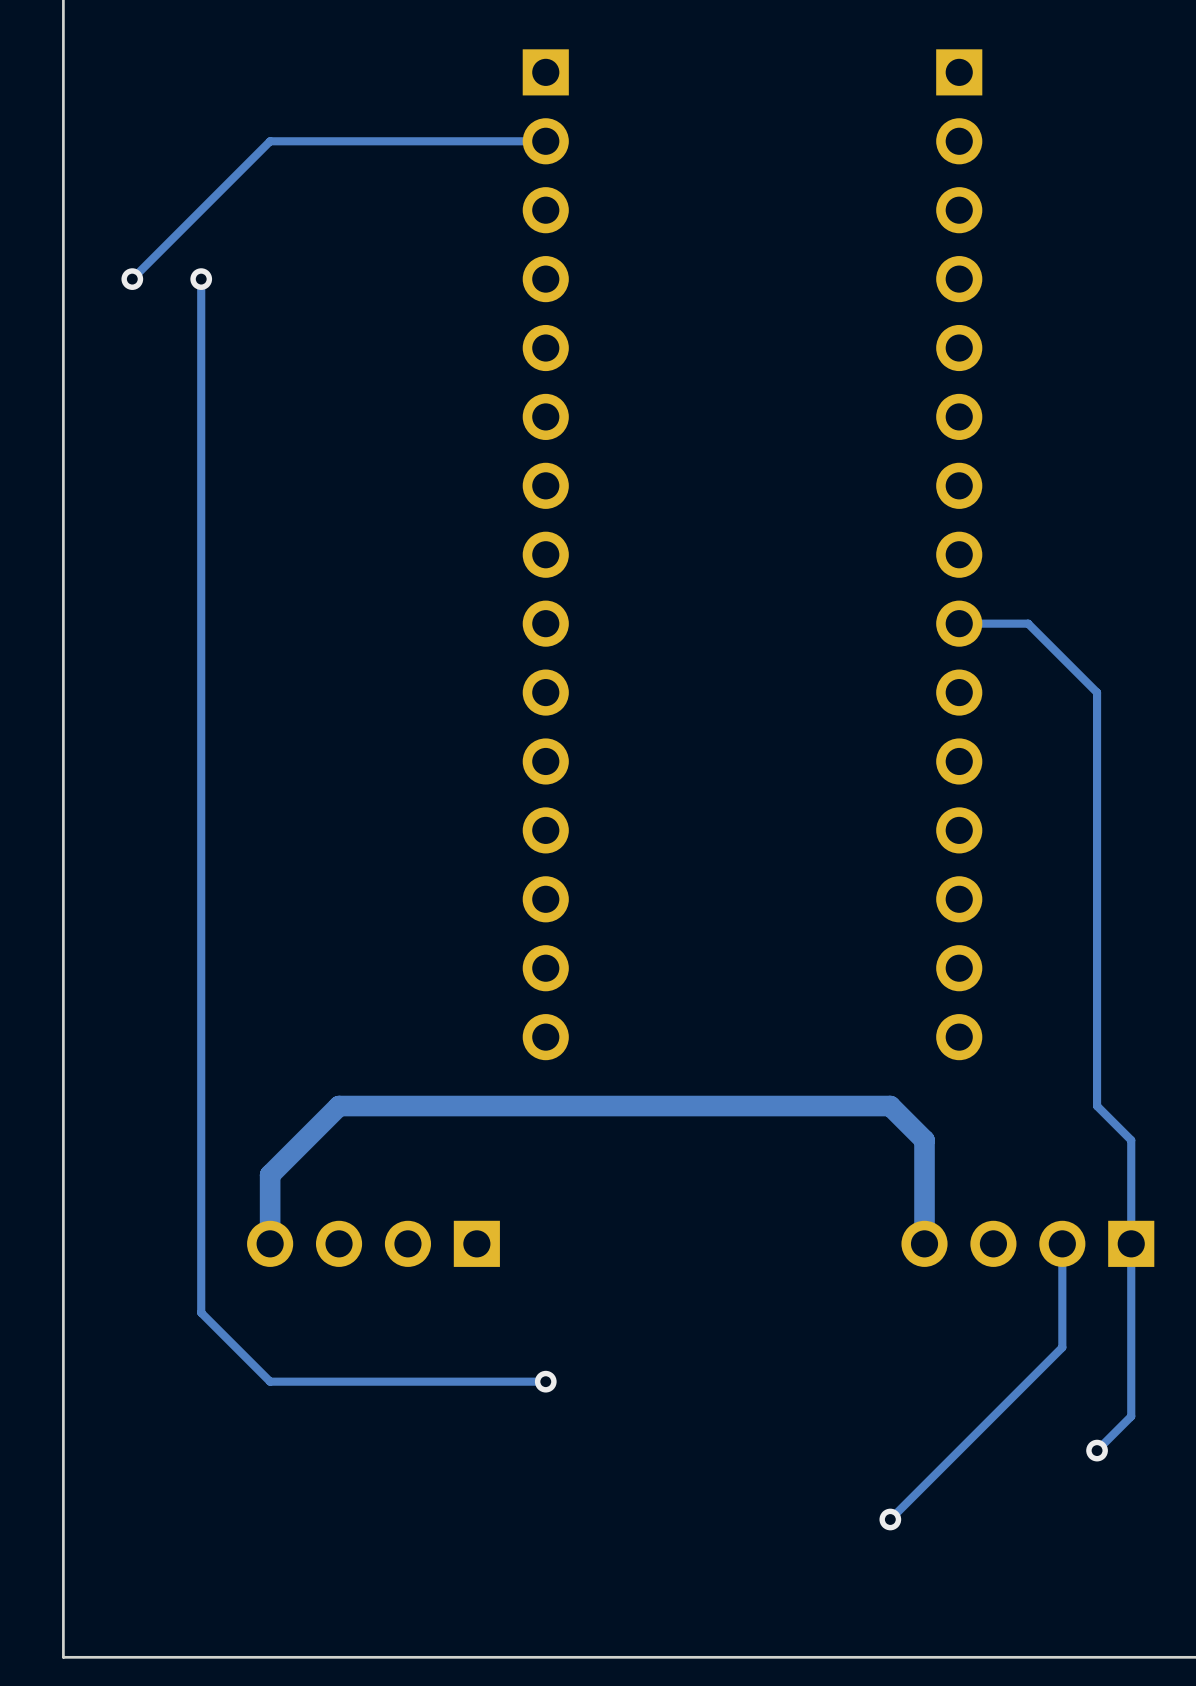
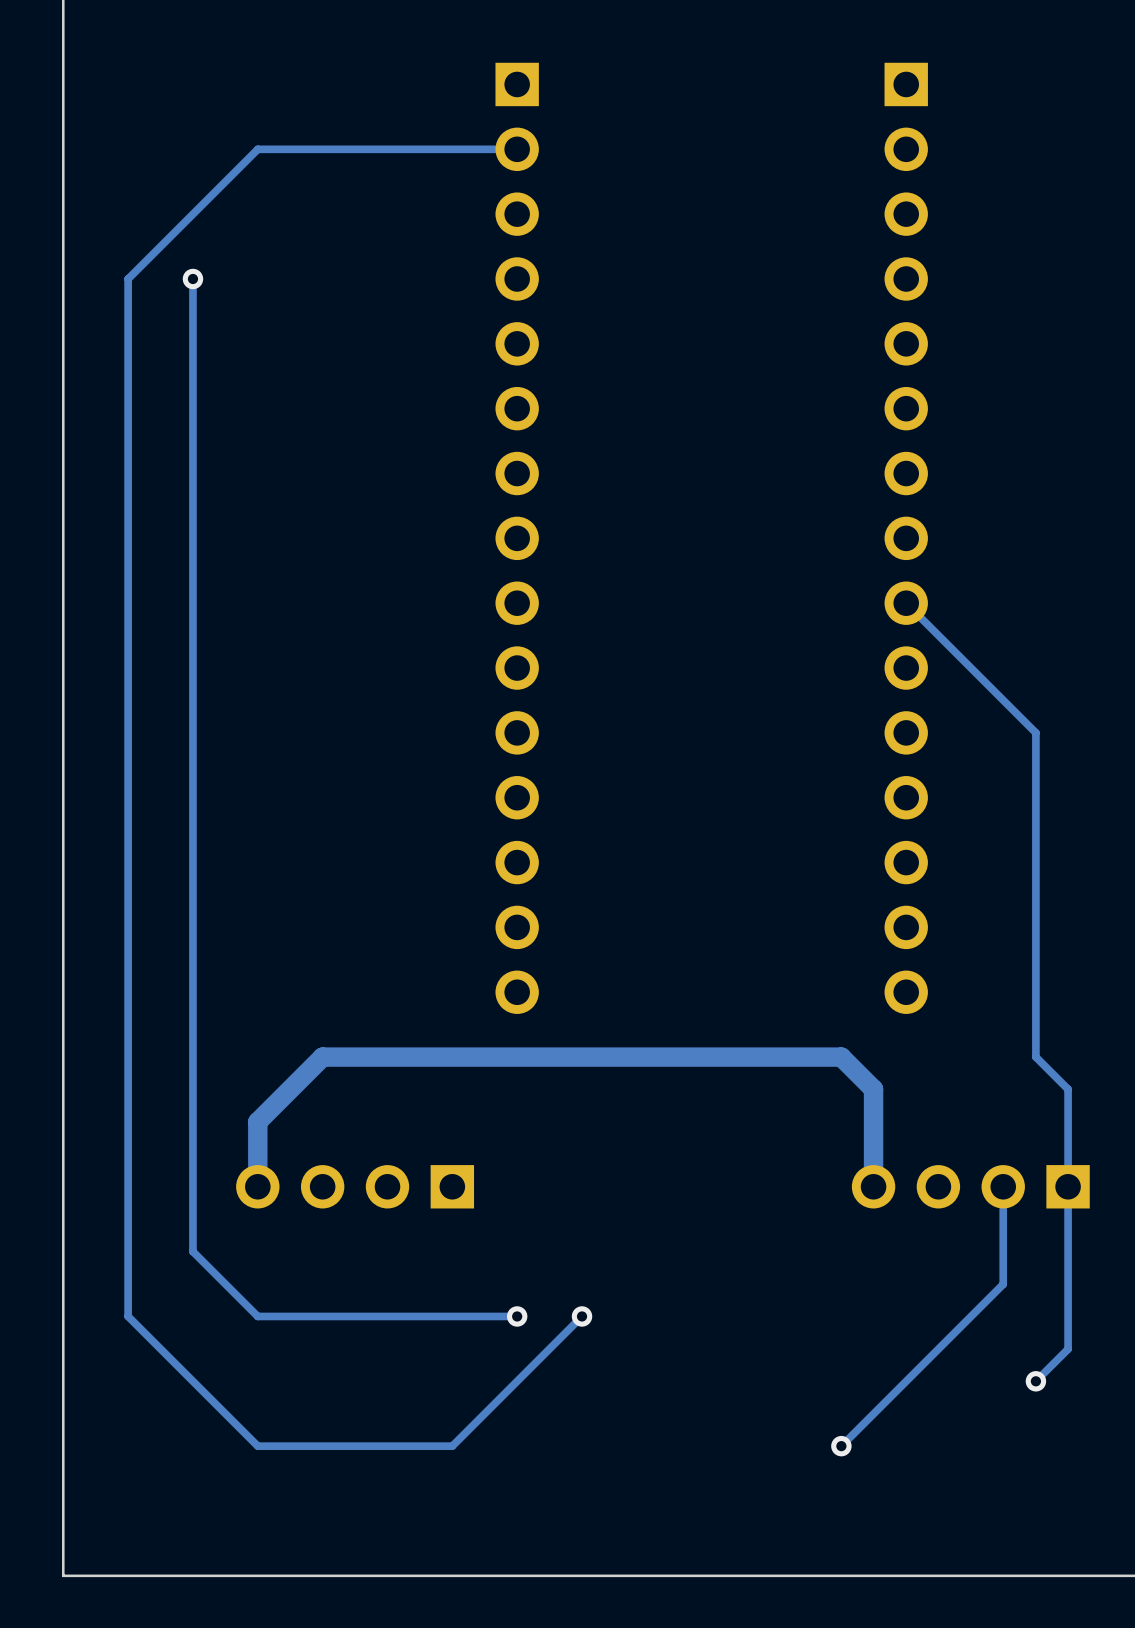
track: none -> (128, 278) (128, 1316) (257, 1446) (452, 1446) (582, 1316)
via: (132, 279) -> none
track: (959, 623) (1028, 623) (1097, 692) (1097, 761) -> (906, 603) (1035, 732)
via: none -> (582, 1316)

